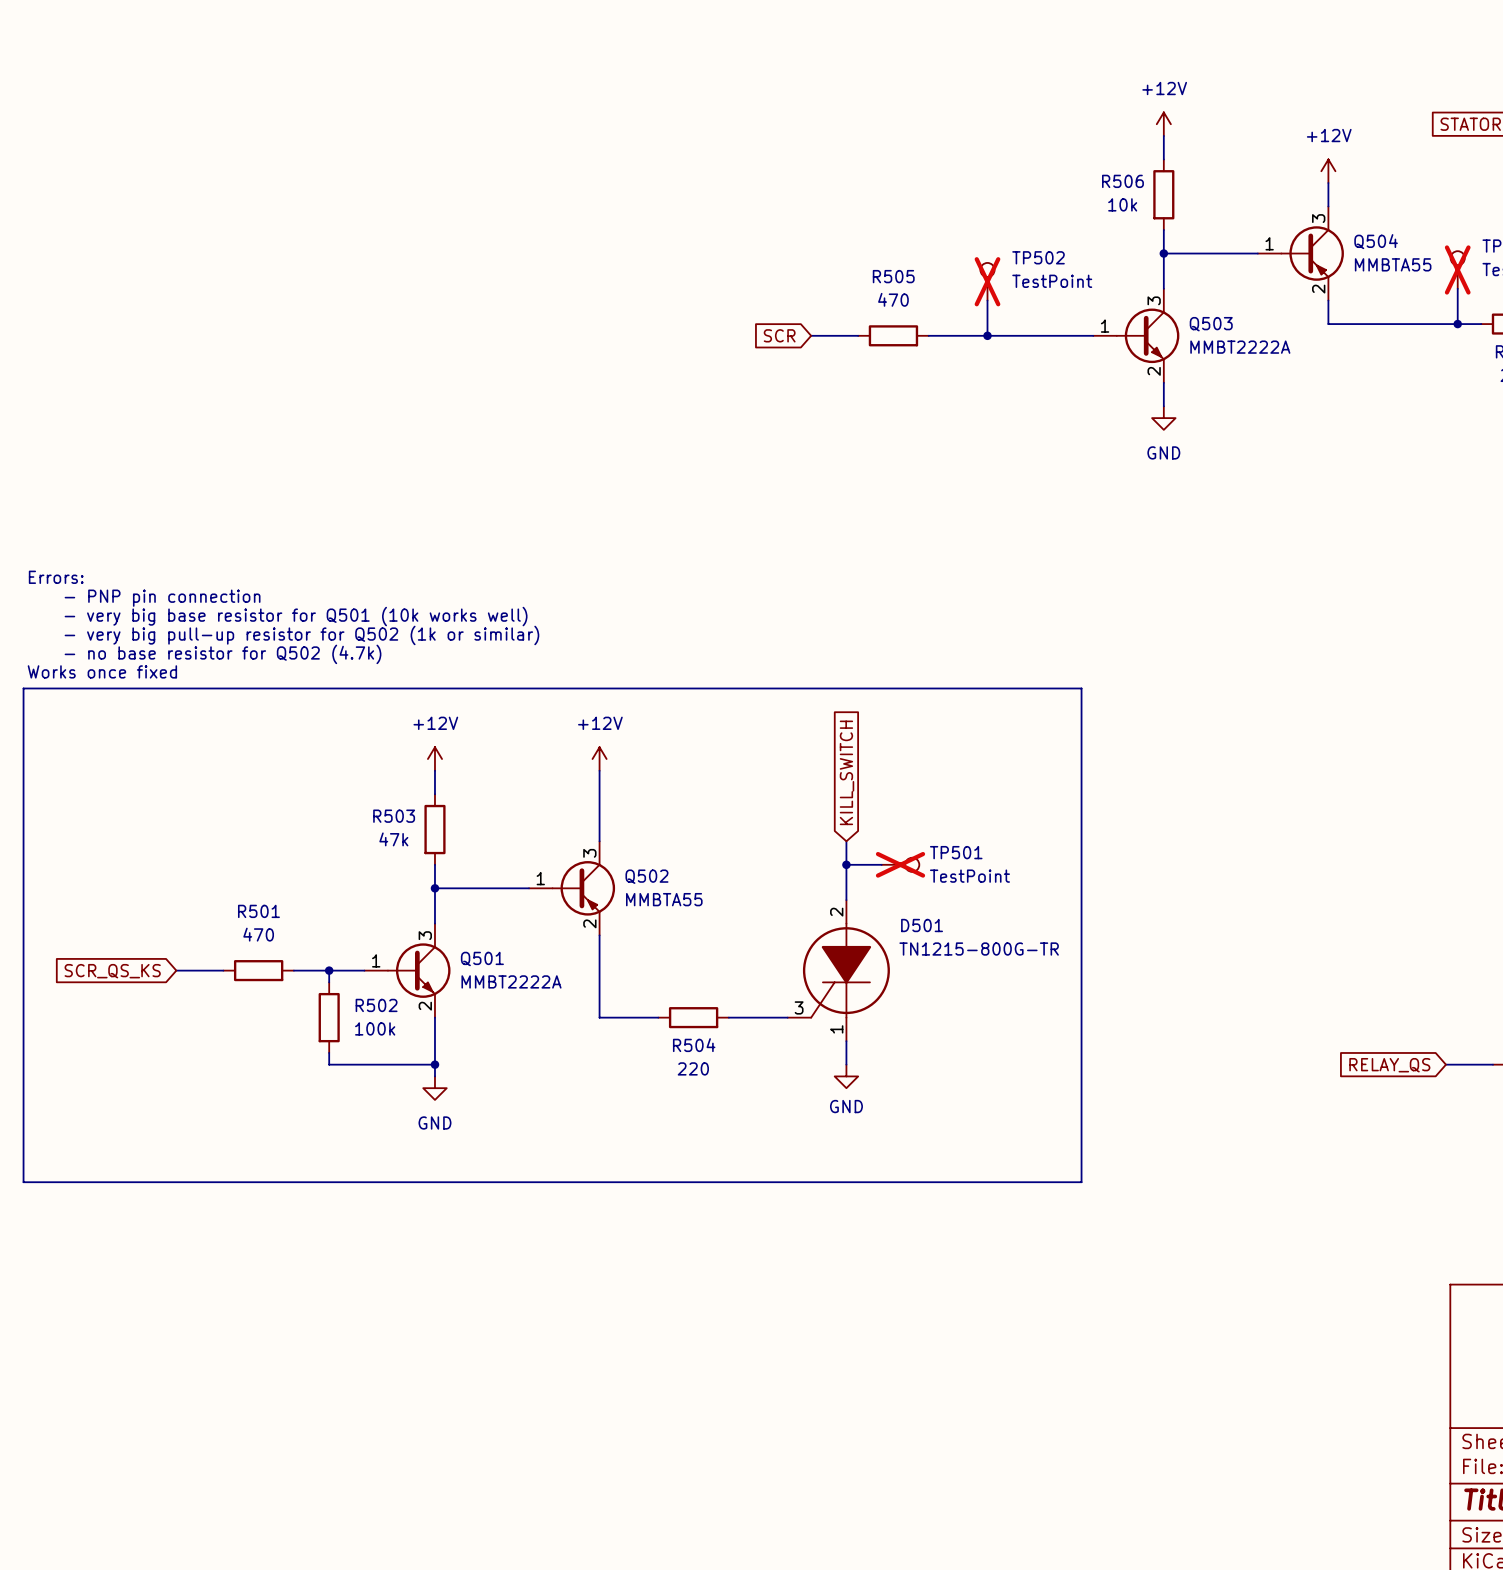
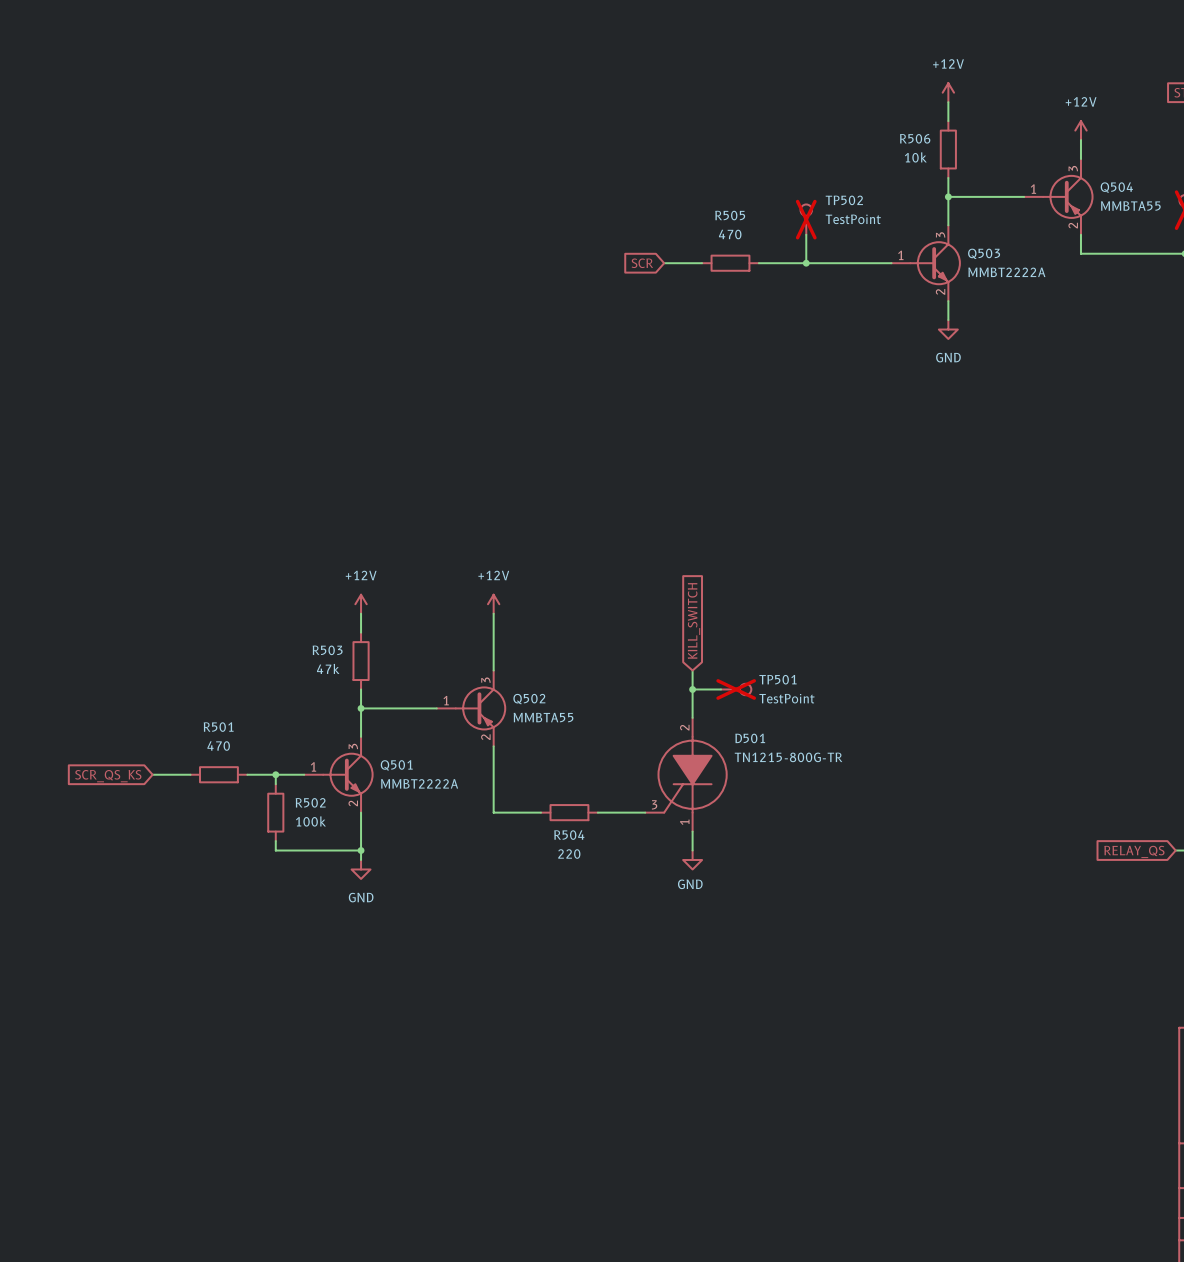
text: Errors: (56, 577) -> none
text: - PNP pin connection (162, 598) -> none
text: - very big base resistor for Q501 (10k works well) (296, 616) -> none
text: - very big pull-up resistor for Q502 (1k or similar) (301, 635) -> none
text: - no base resistor for Q502 (4.7k) (223, 654) -> none
text: Works once fixed (102, 671) -> none
line: (23, 688) (1081, 688) (1081, 1182) (23, 1182) (23, 688) -> none

